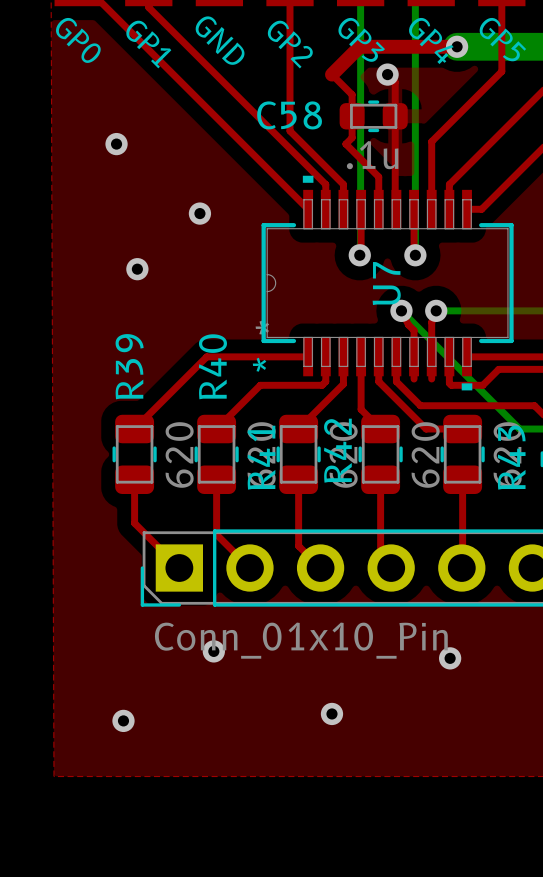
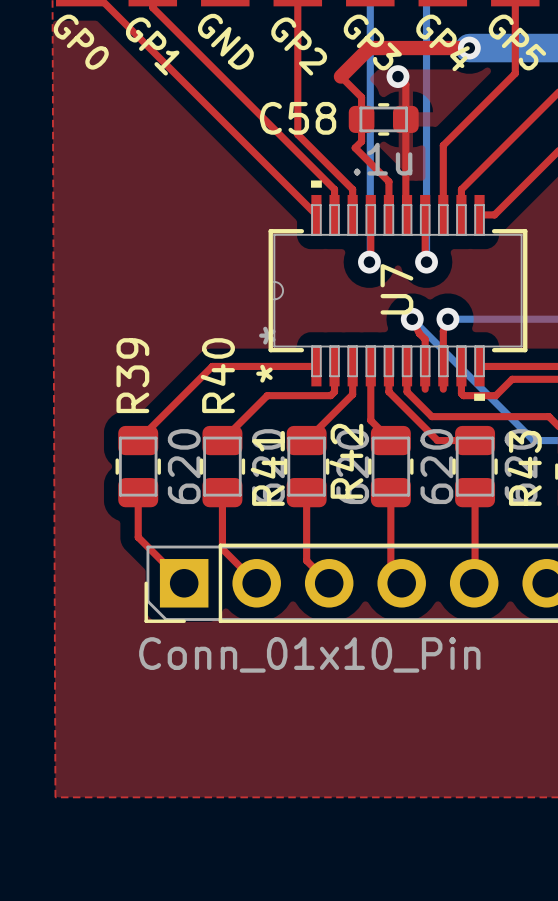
via: (116, 144) -> none
via: (199, 213) -> none
via: (137, 269) -> none
via: (213, 651) -> none
via: (450, 658) -> none
via: (331, 713) -> none
via: (123, 720) -> none

